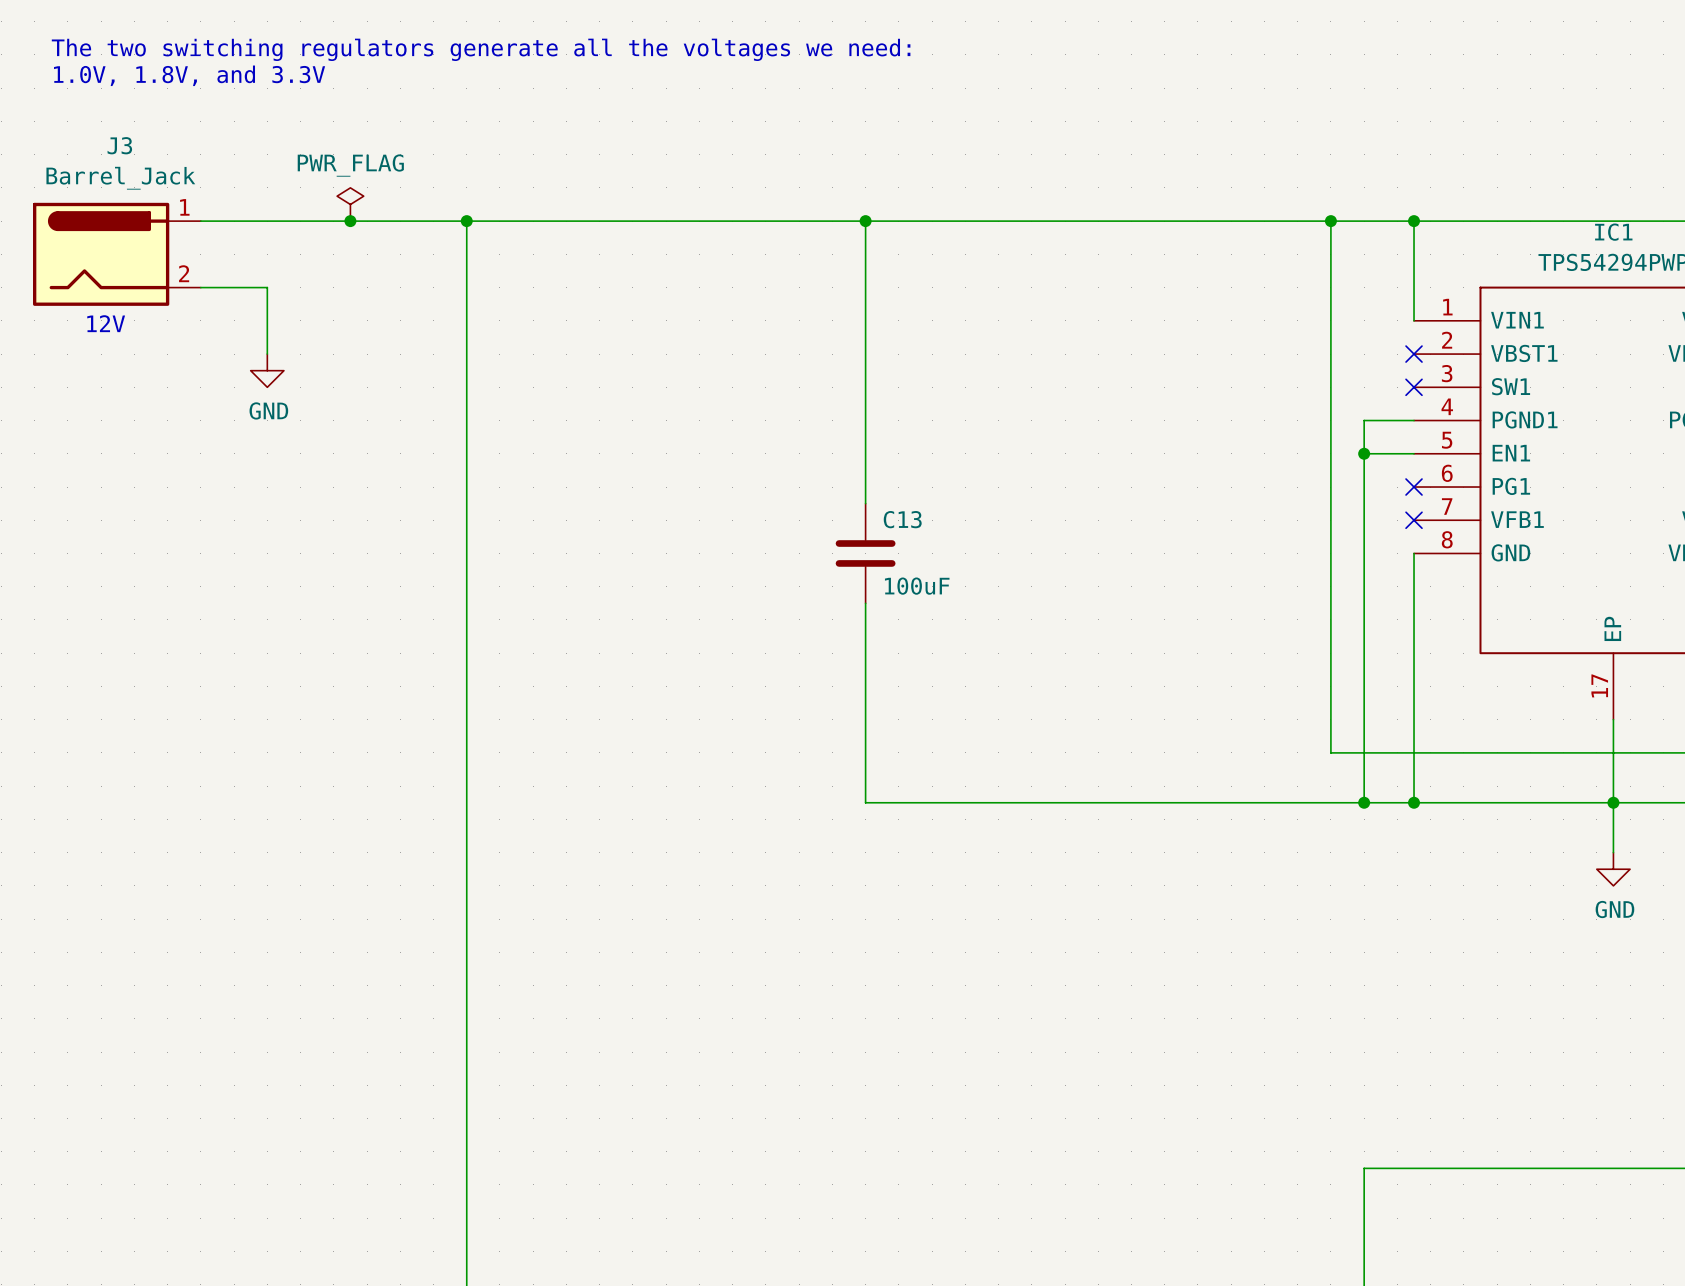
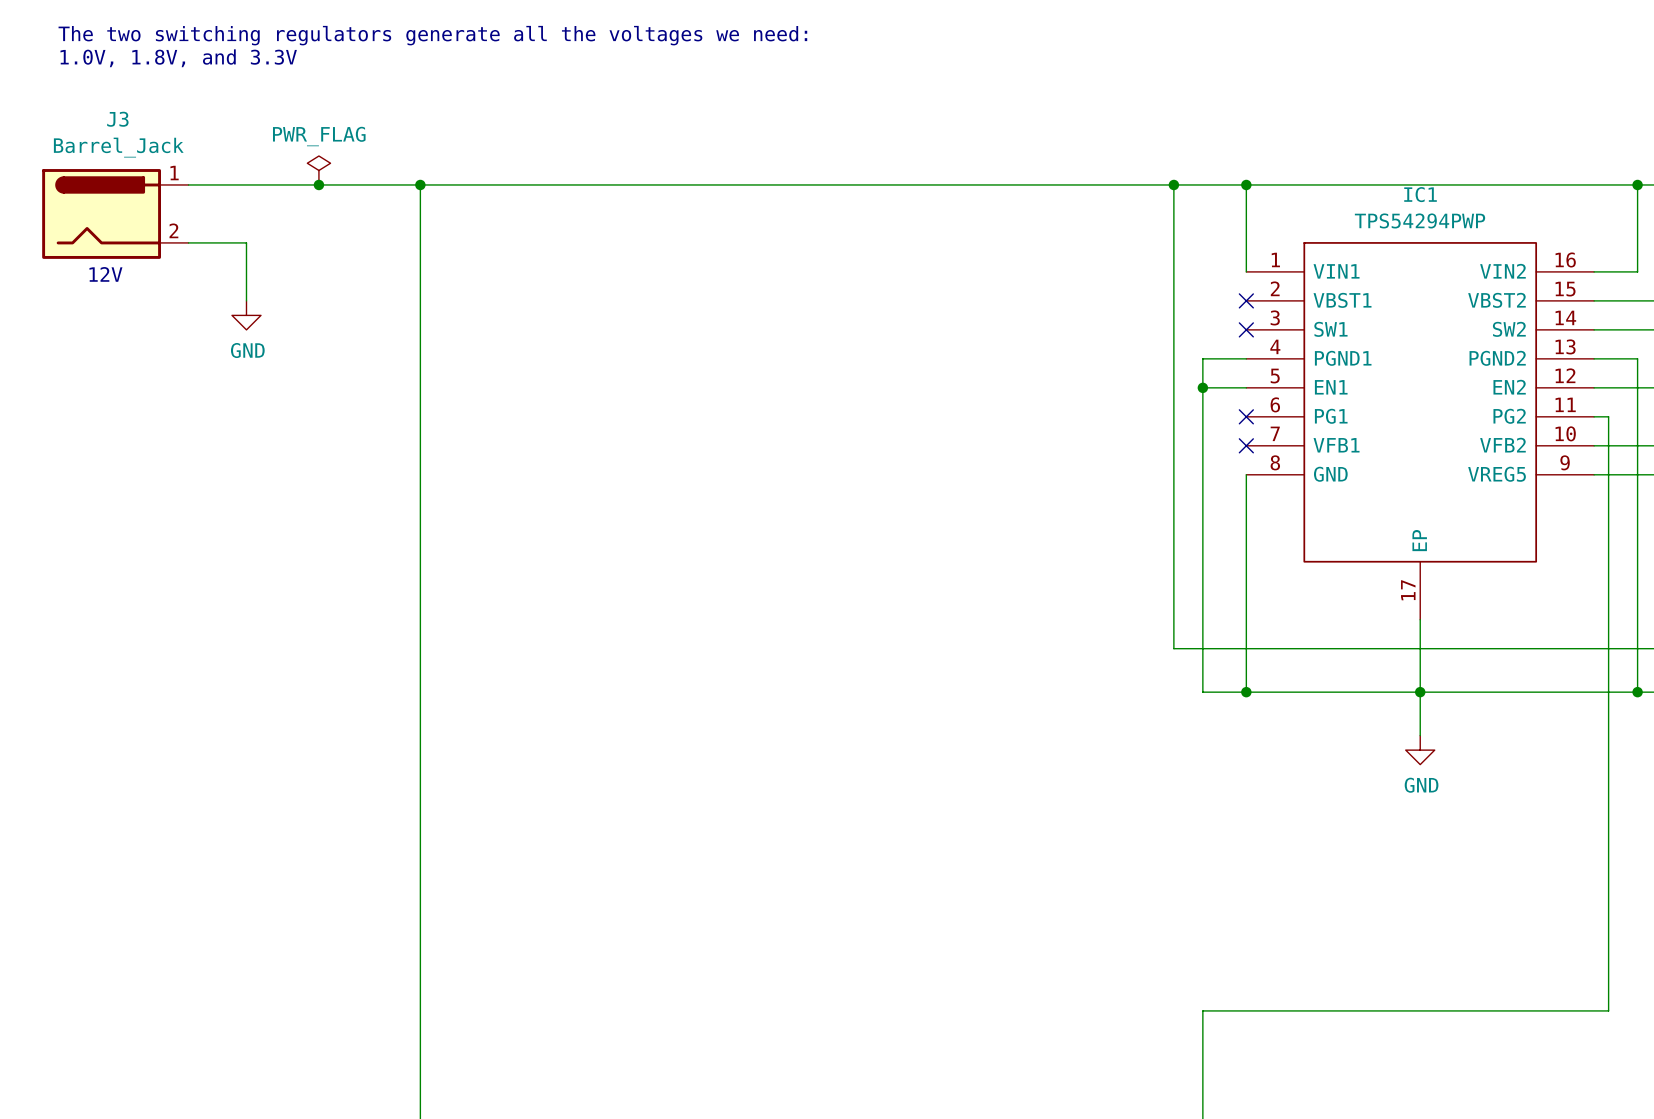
wire: (865, 221) (865, 503) -> none
junction: (865, 221) -> none
C13: 100uF (865, 553) -> none
wire: (865, 603) (865, 802) (1364, 802) -> none
junction: (1364, 802) -> none

